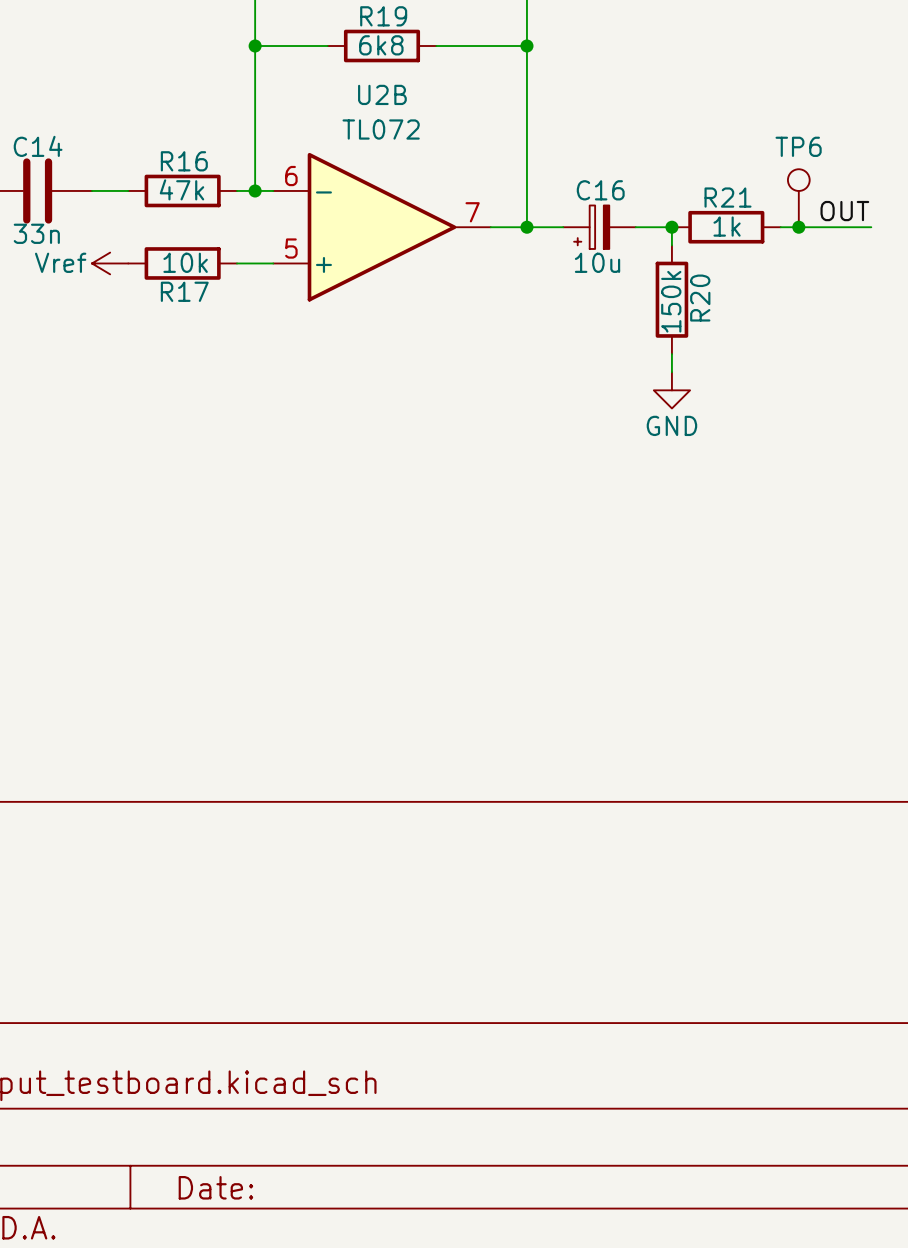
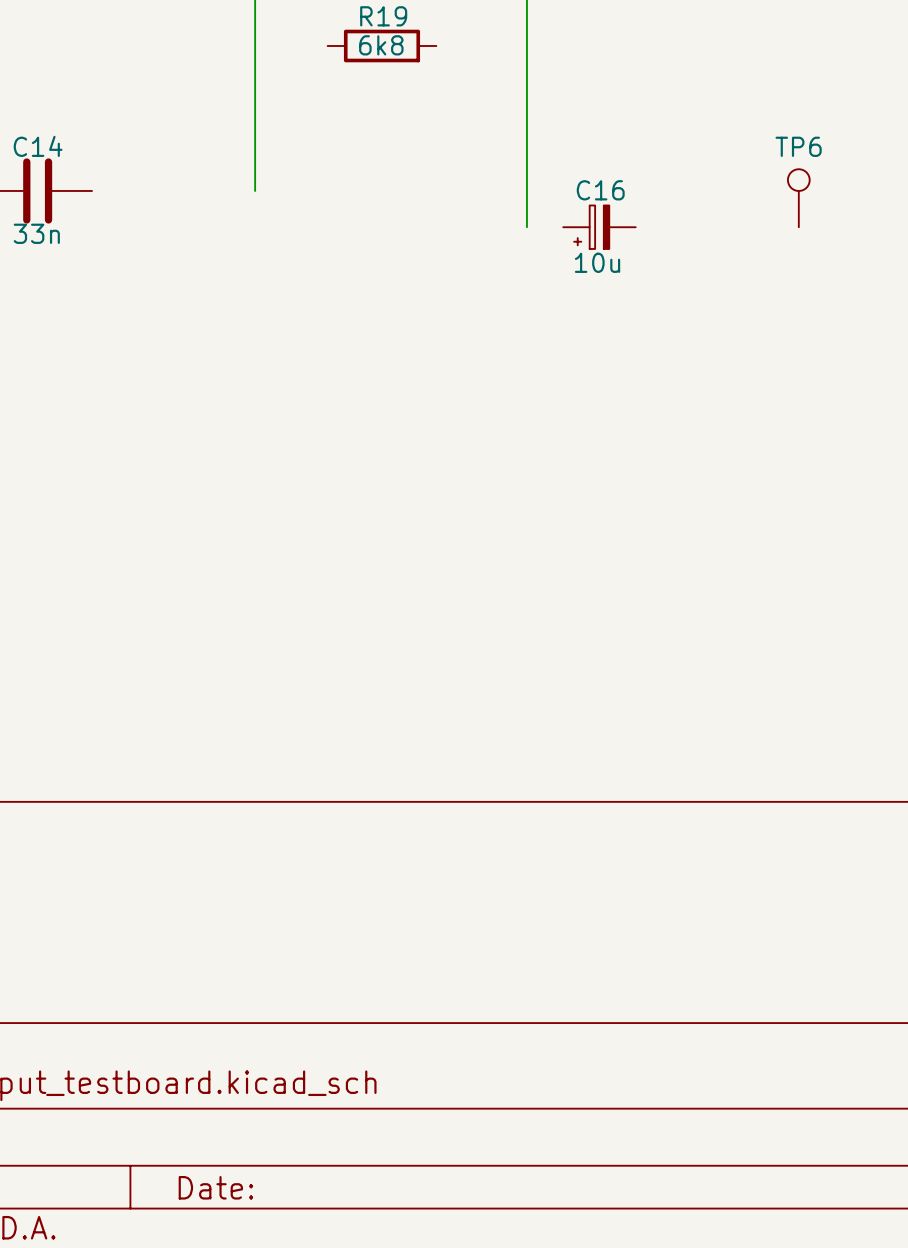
wire: (255, 46) (327, 46) -> none
junction: (255, 46) -> none
wire: (436, 46) (526, 46) -> none
junction: (526, 46) -> none
wire: (92, 190) (128, 190) -> none
R16: 47k (182, 190) -> none
wire: (237, 190) (273, 190) -> none
junction: (255, 190) -> none
label: OUT (844, 211) -> none
U2B: TL072 (381, 227) -> none
wire: (490, 227) (563, 227) -> none
junction: (526, 227) -> none
wire: (635, 227) (671, 227) (671, 245) -> none
junction: (671, 227) -> none
R21: 1k (726, 227) -> none
wire: (780, 227) (871, 227) -> none
junction: (798, 227) -> none
power symbol: Vref (110, 263) -> none
R17: 10k (182, 263) -> none
wire: (237, 263) (273, 263) -> none
R20: 150k (671, 299) -> none
wire: (671, 354) (671, 372) -> none
power symbol: GND (671, 390) -> none

